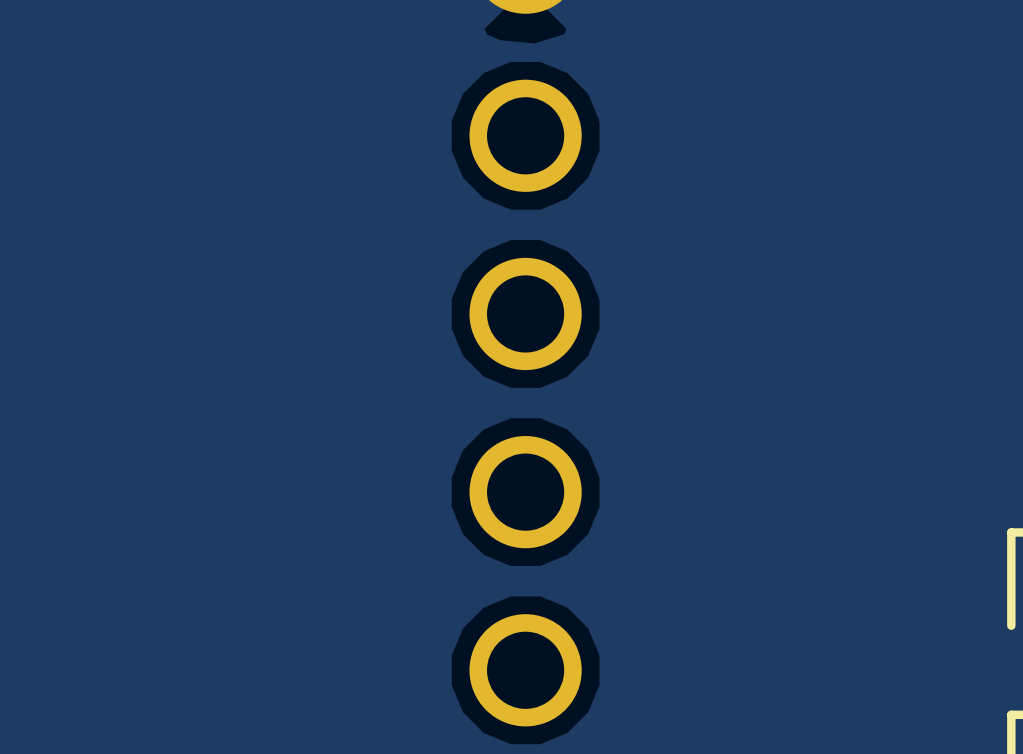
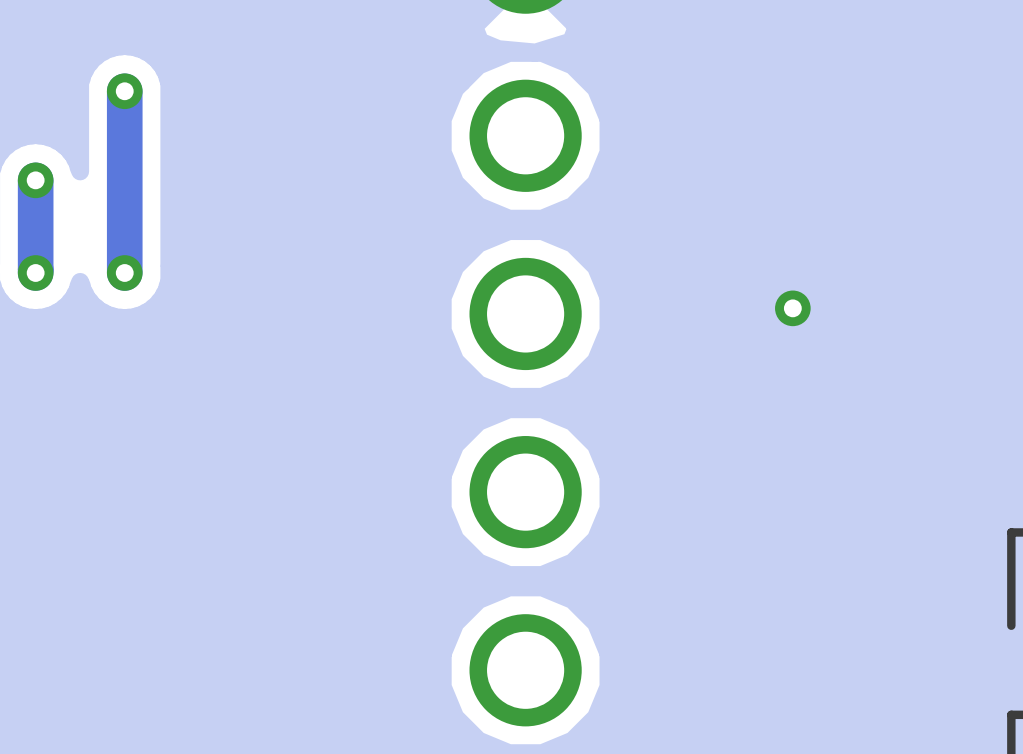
track: none -> (124, 91) (124, 272)
via: none -> (124, 91)
track: none -> (35, 180) (35, 272)
via: none -> (35, 180)
via: none -> (35, 272)
via: none -> (124, 272)
via: none -> (792, 308)

